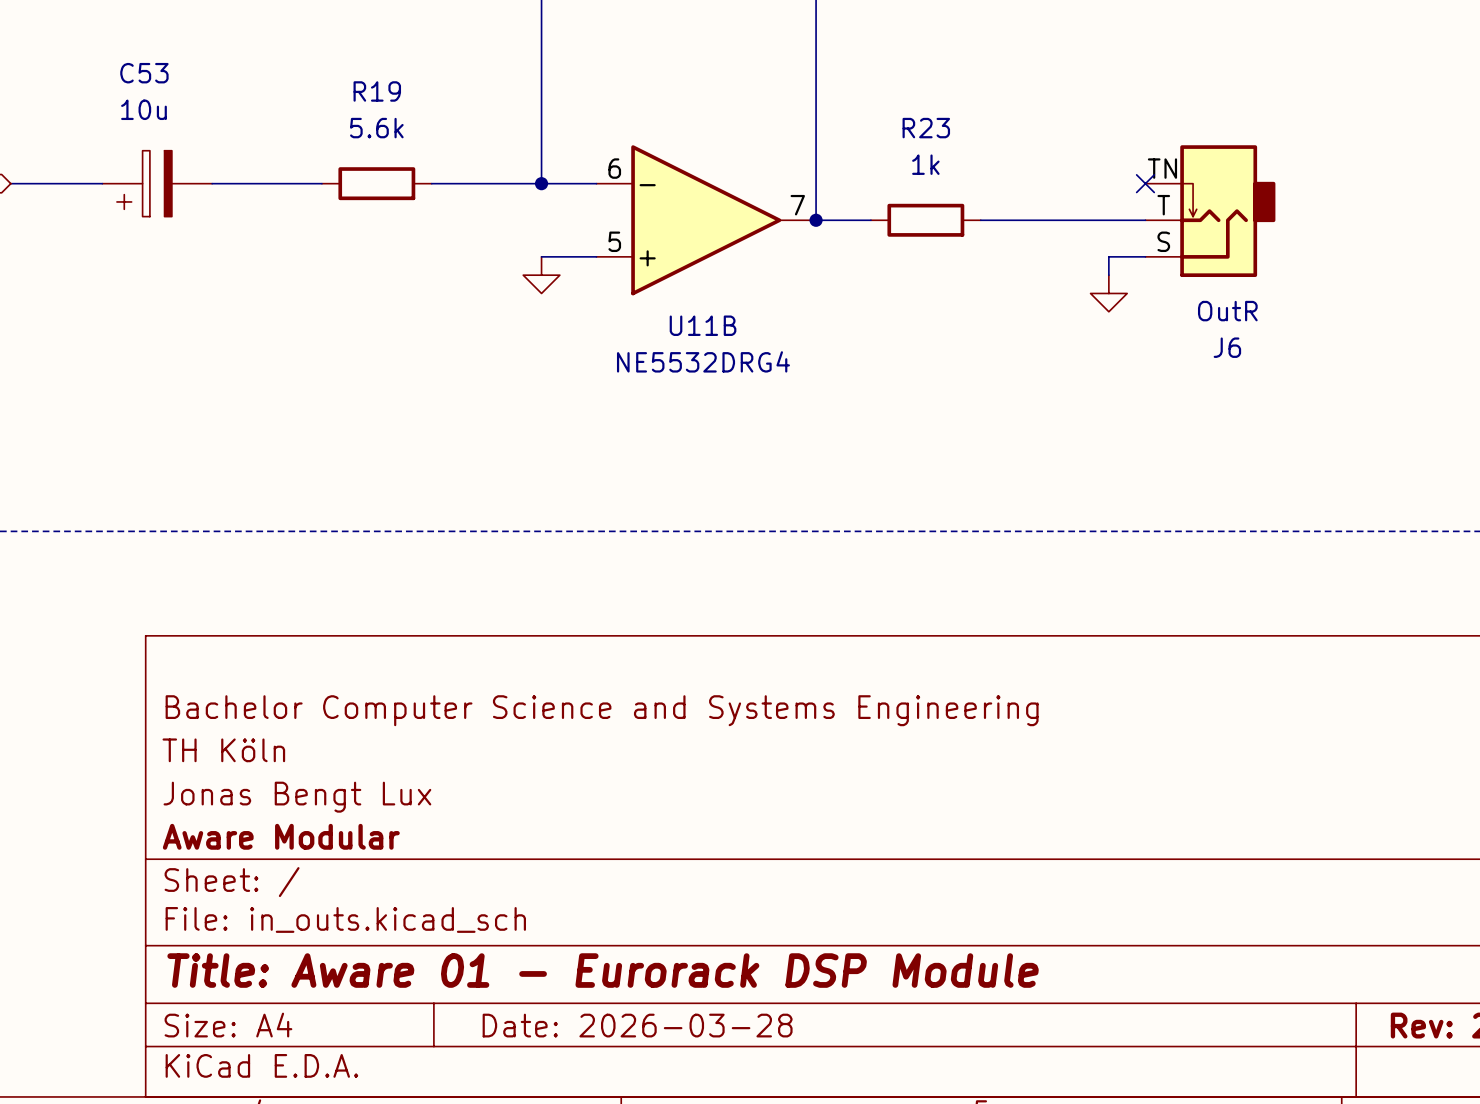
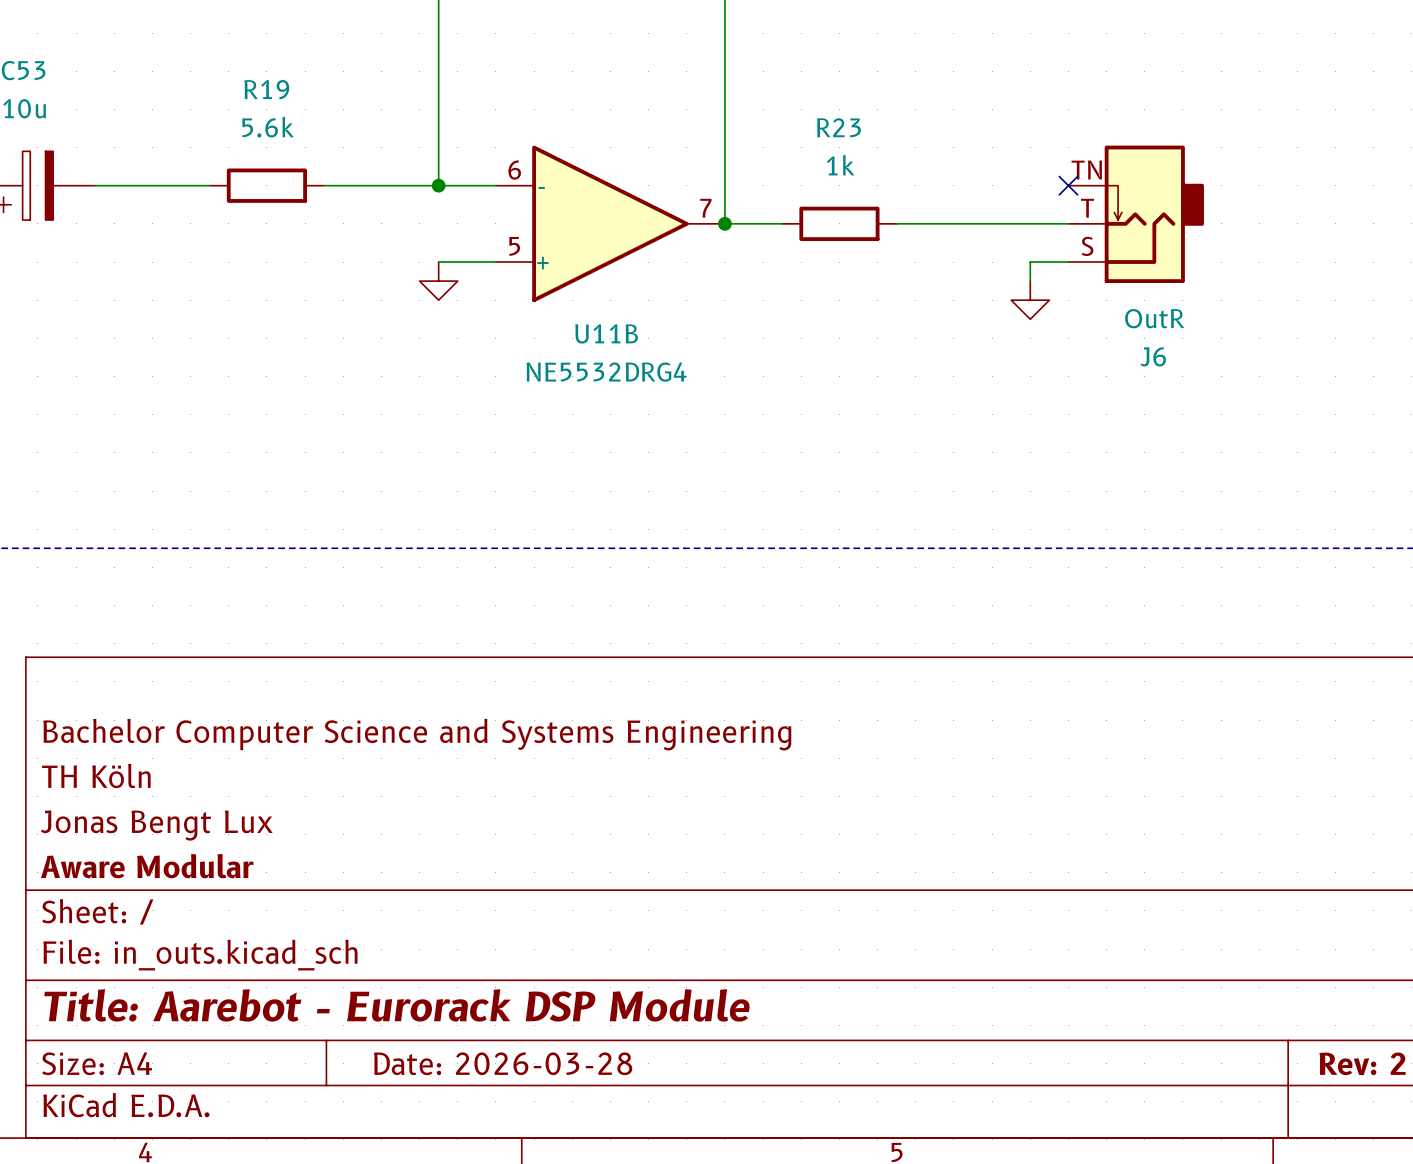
title block: Title: Aware 01 - Eurorack DSP Module (603, 970) -> Title: Aarebot - Eurorack DSP Module (397, 1005)

